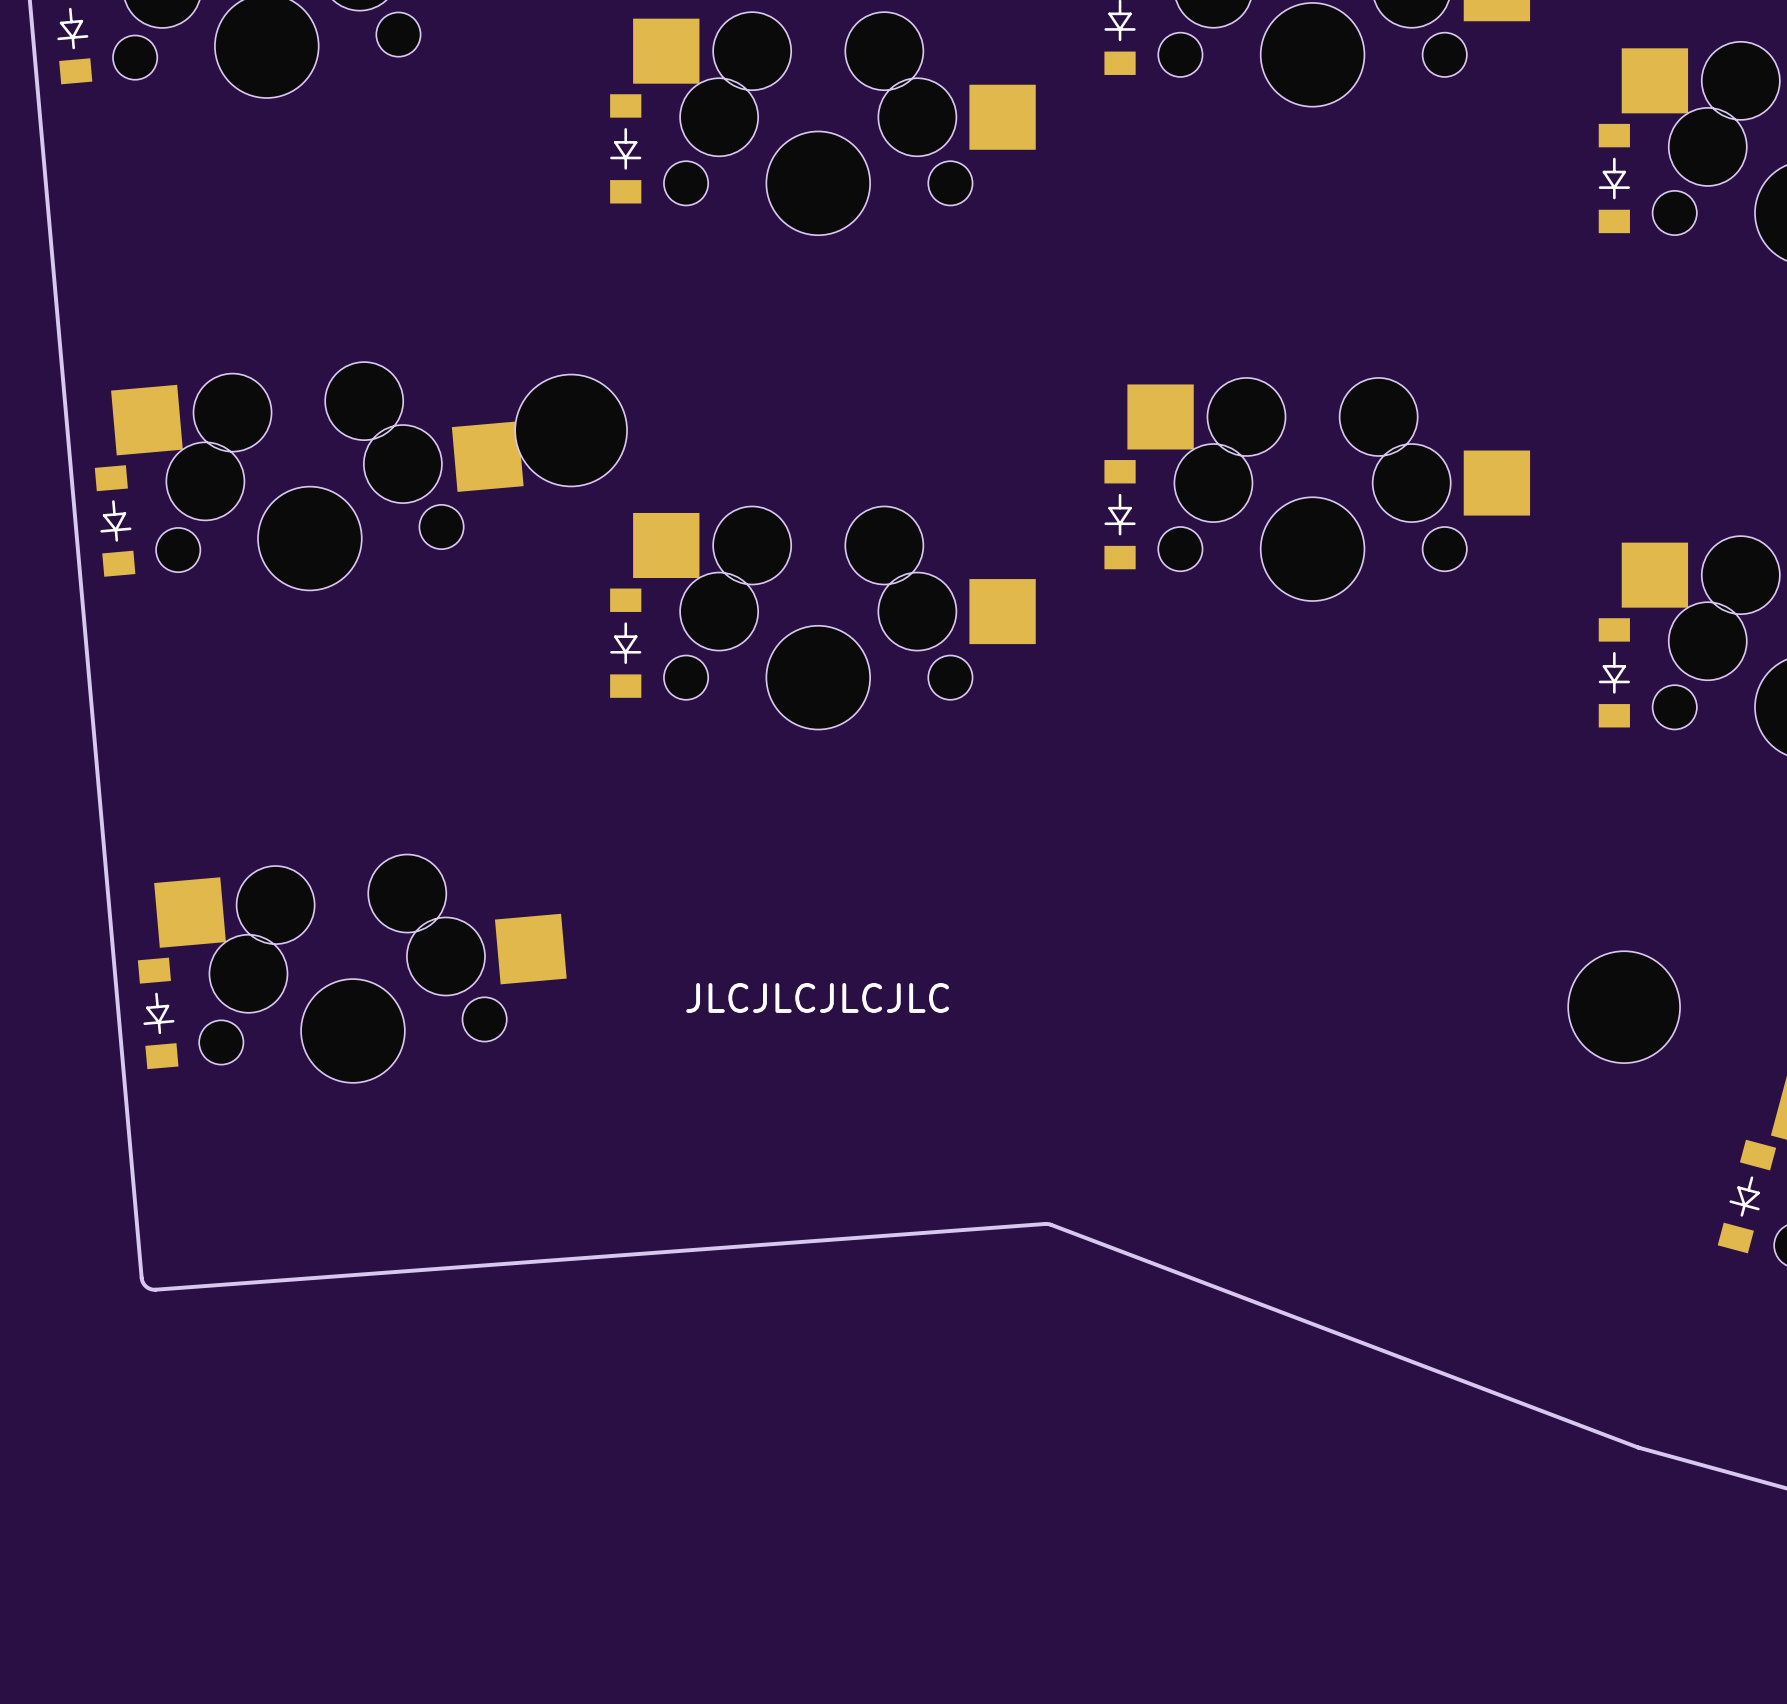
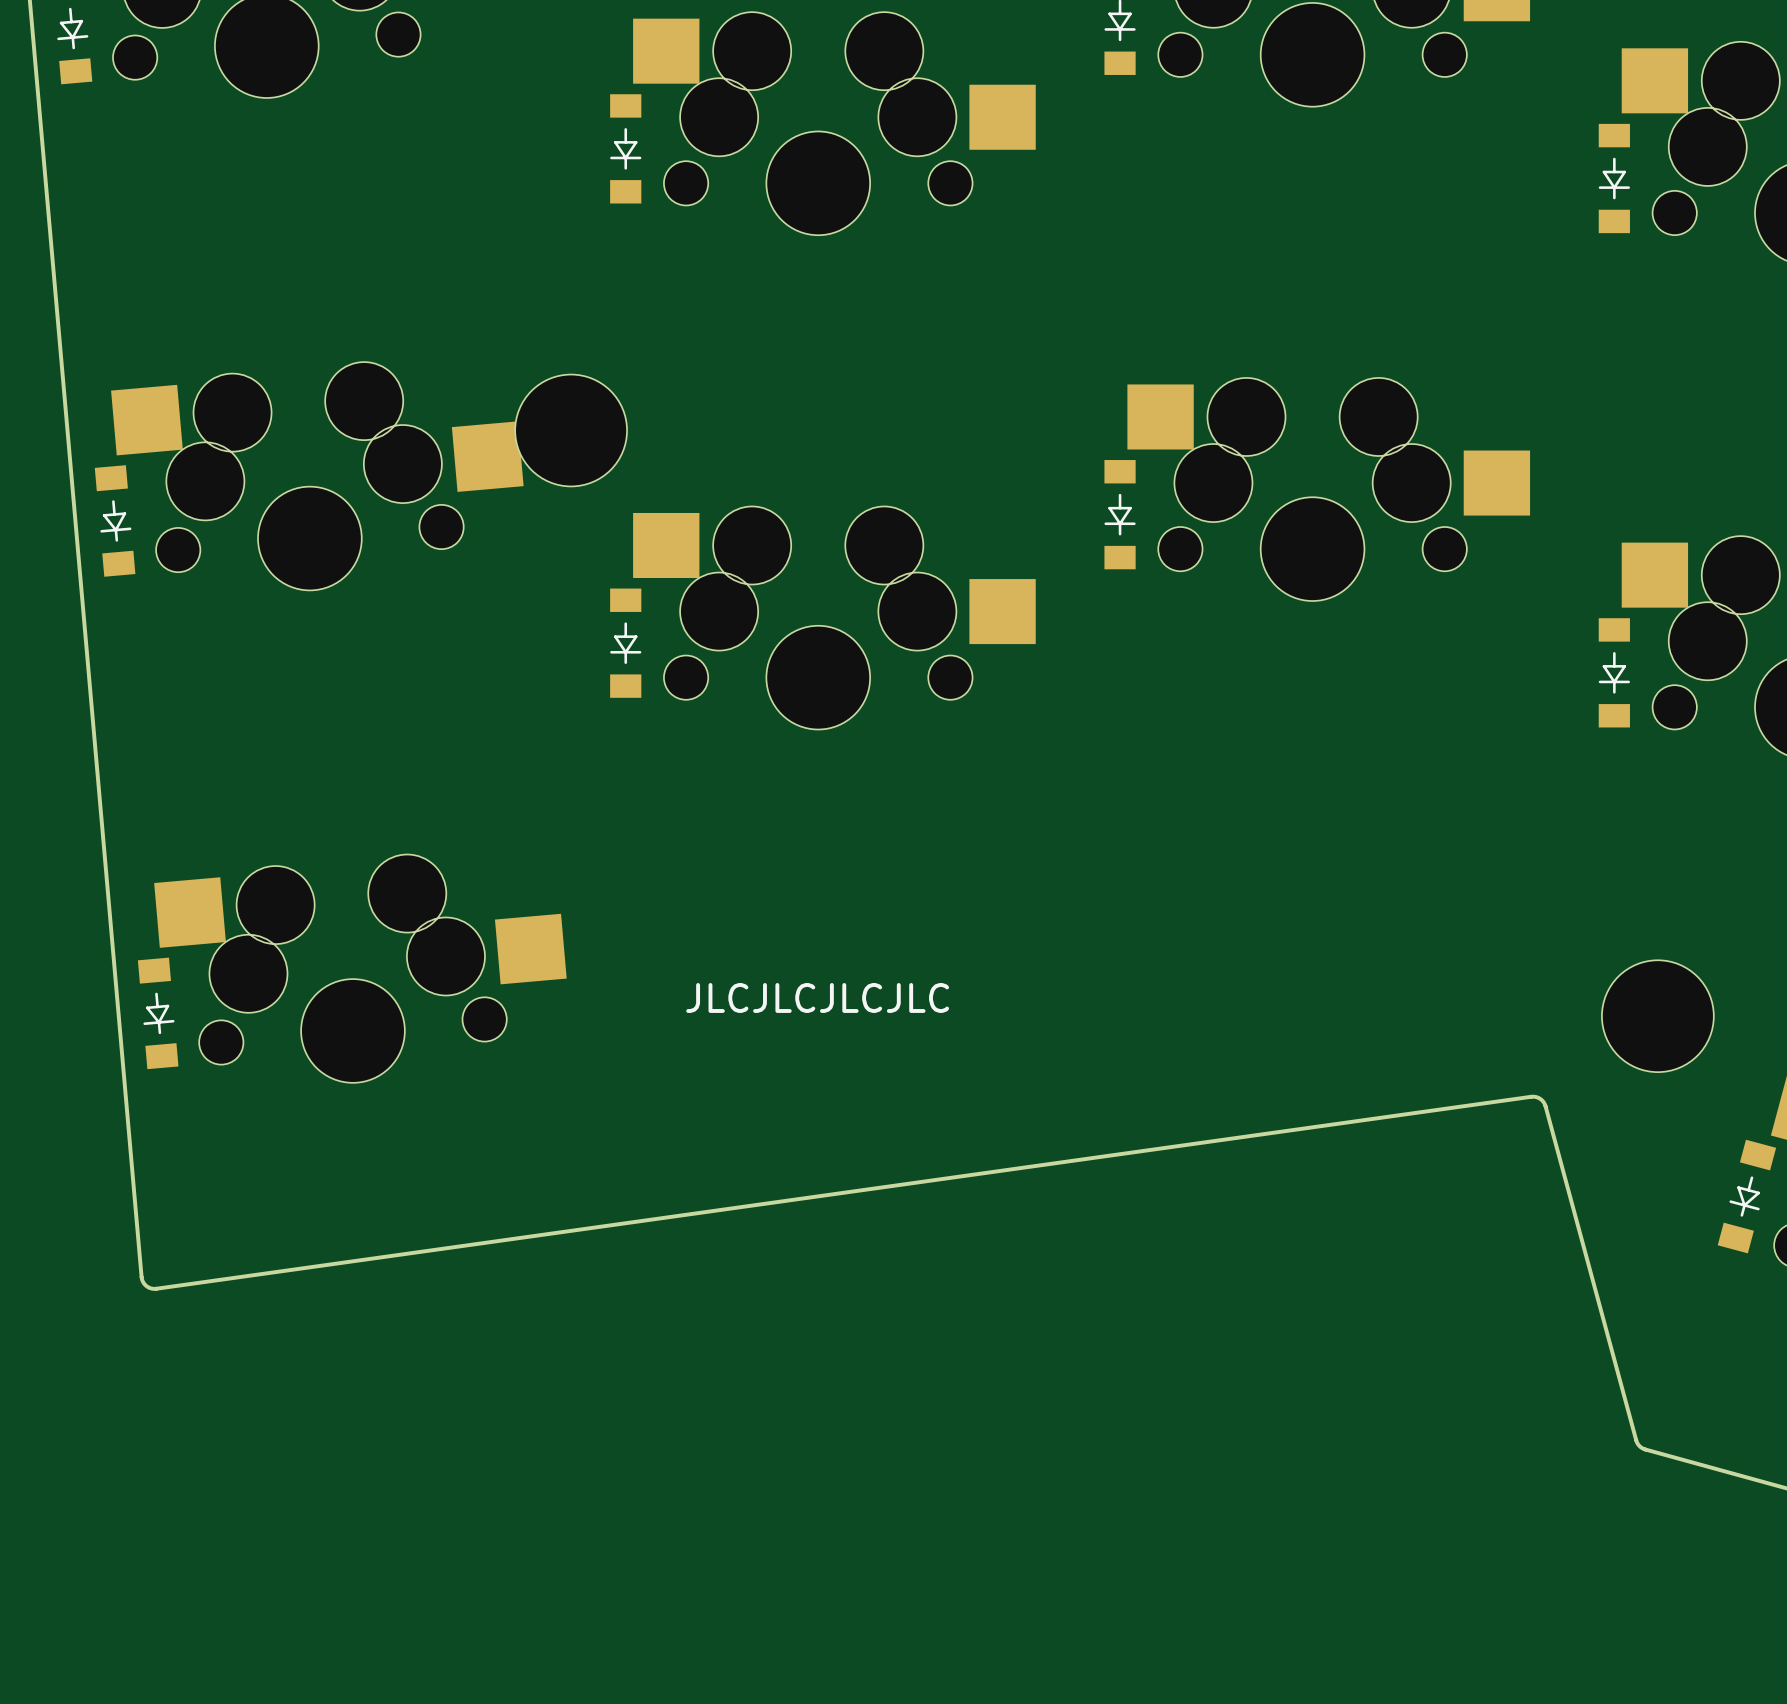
part position: (1624, 1007) -> (1657, 1016)
board edge: (141, 1277) (146, 1286) (155, 1289) (1048, 1224) (1645, 1449) -> (141, 1277) (146, 1286) (156, 1288) (1534, 1096) (1541, 1099) (1545, 1106) (1636, 1440) (1639, 1446) (1645, 1449)

